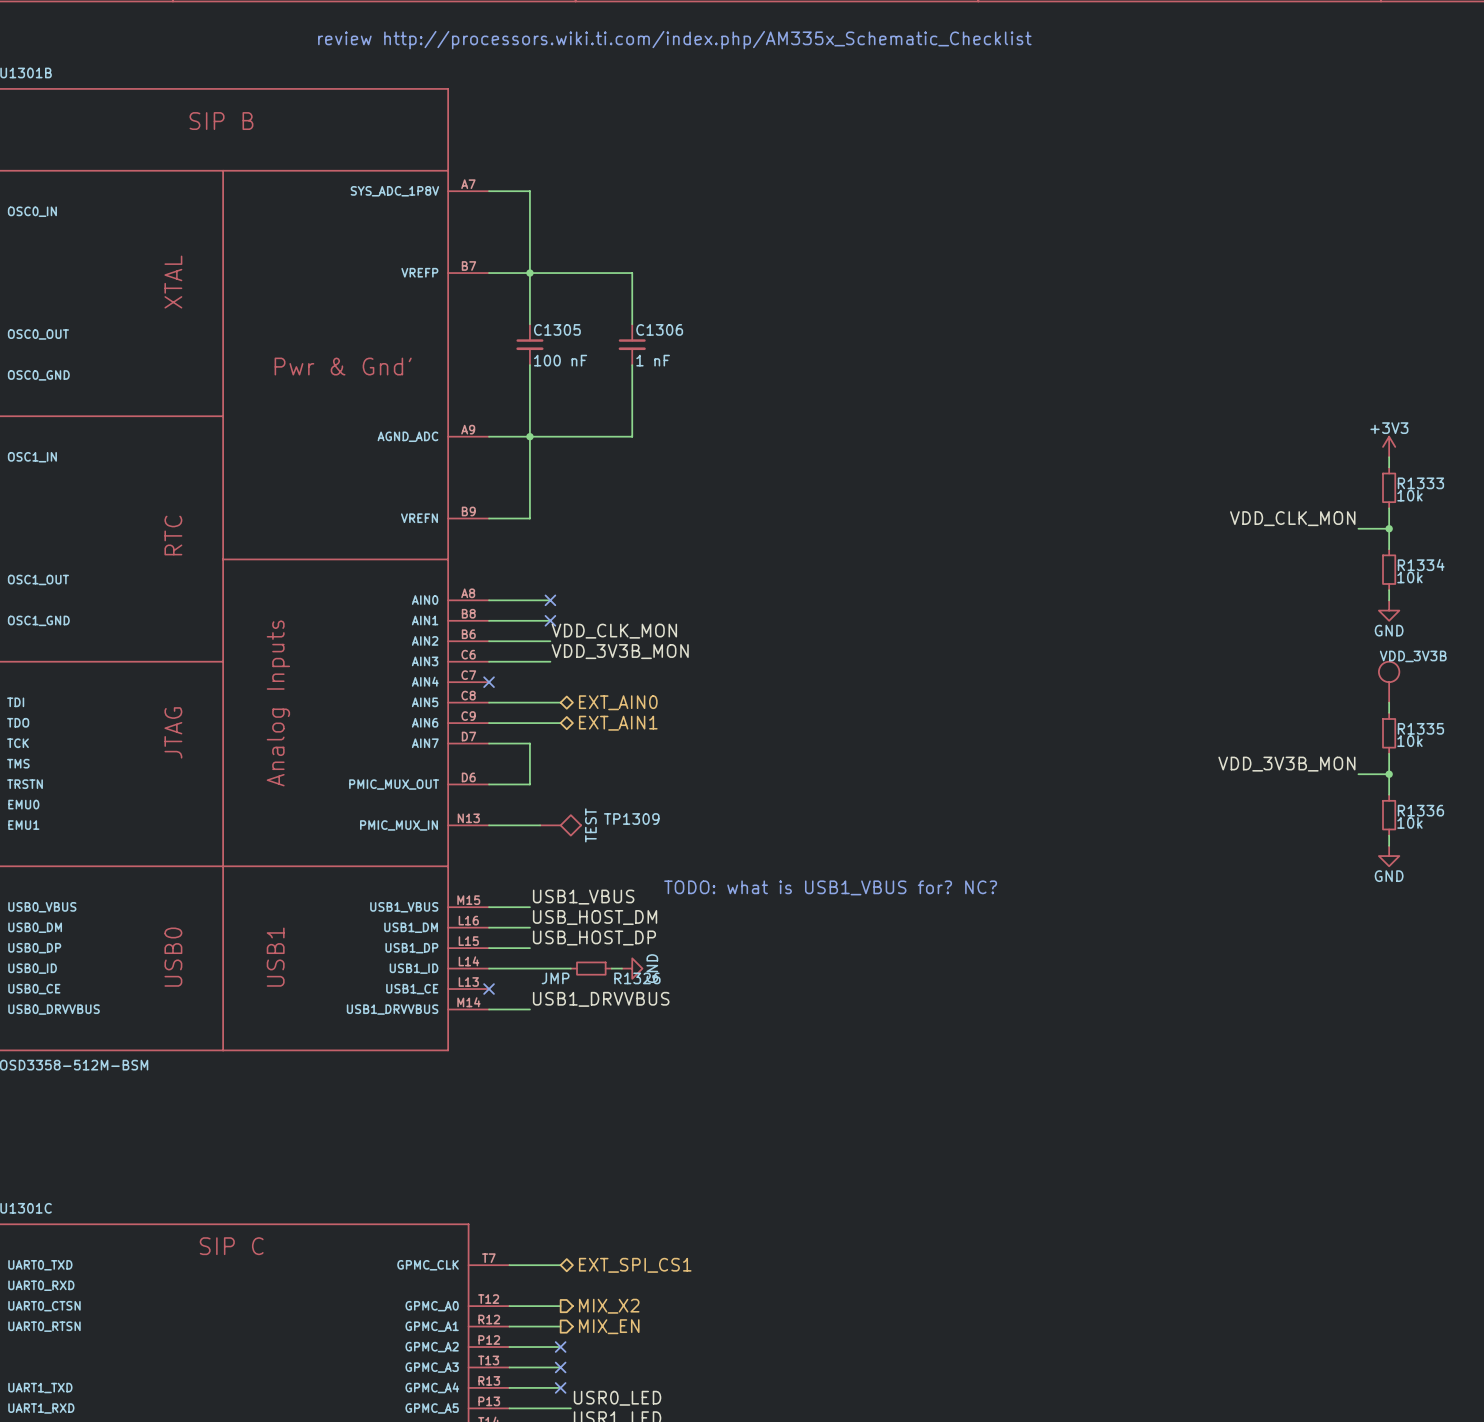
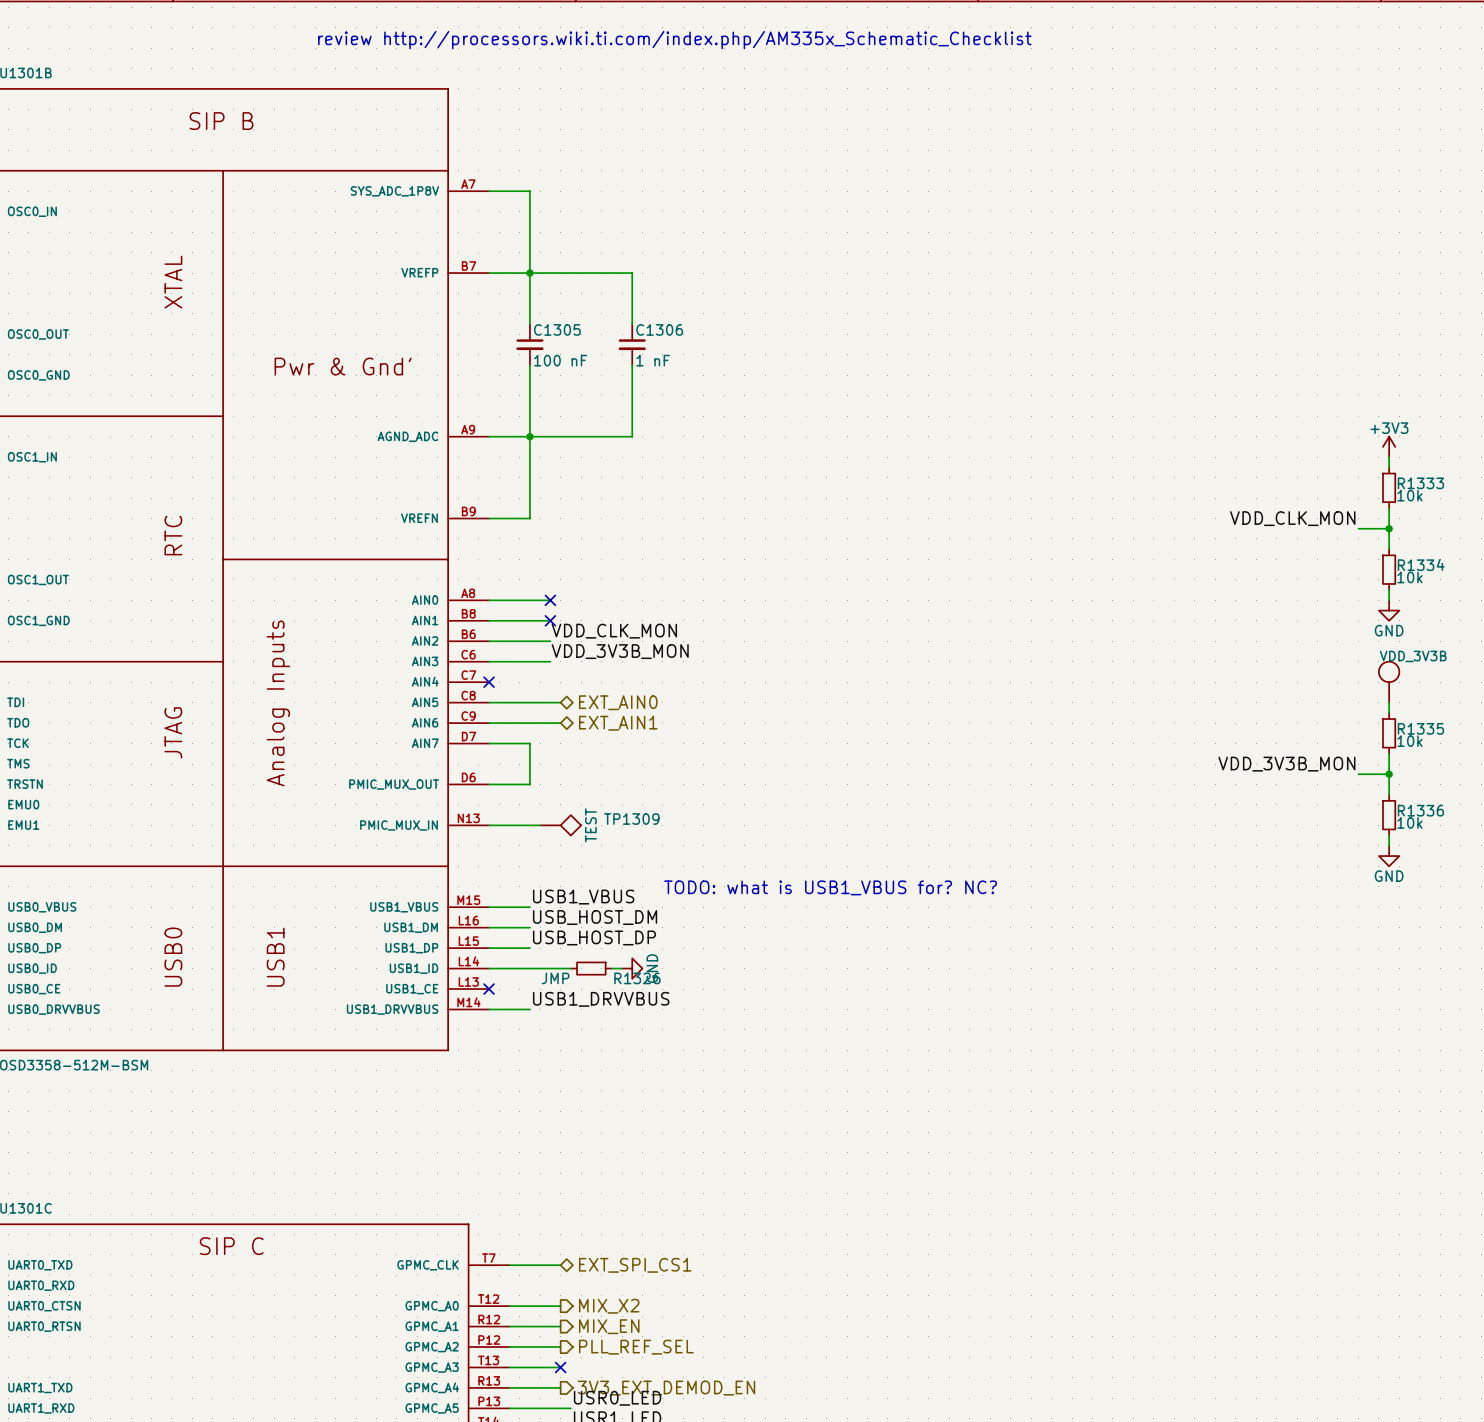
no-connect mark: (560, 1347) -> none
hierarchical label: none -> PLL_REF_SEL (636, 1347)
no-connect mark: (560, 1387) -> none
hierarchical label: none -> 3V3_EXT_DEMOD_EN (666, 1388)

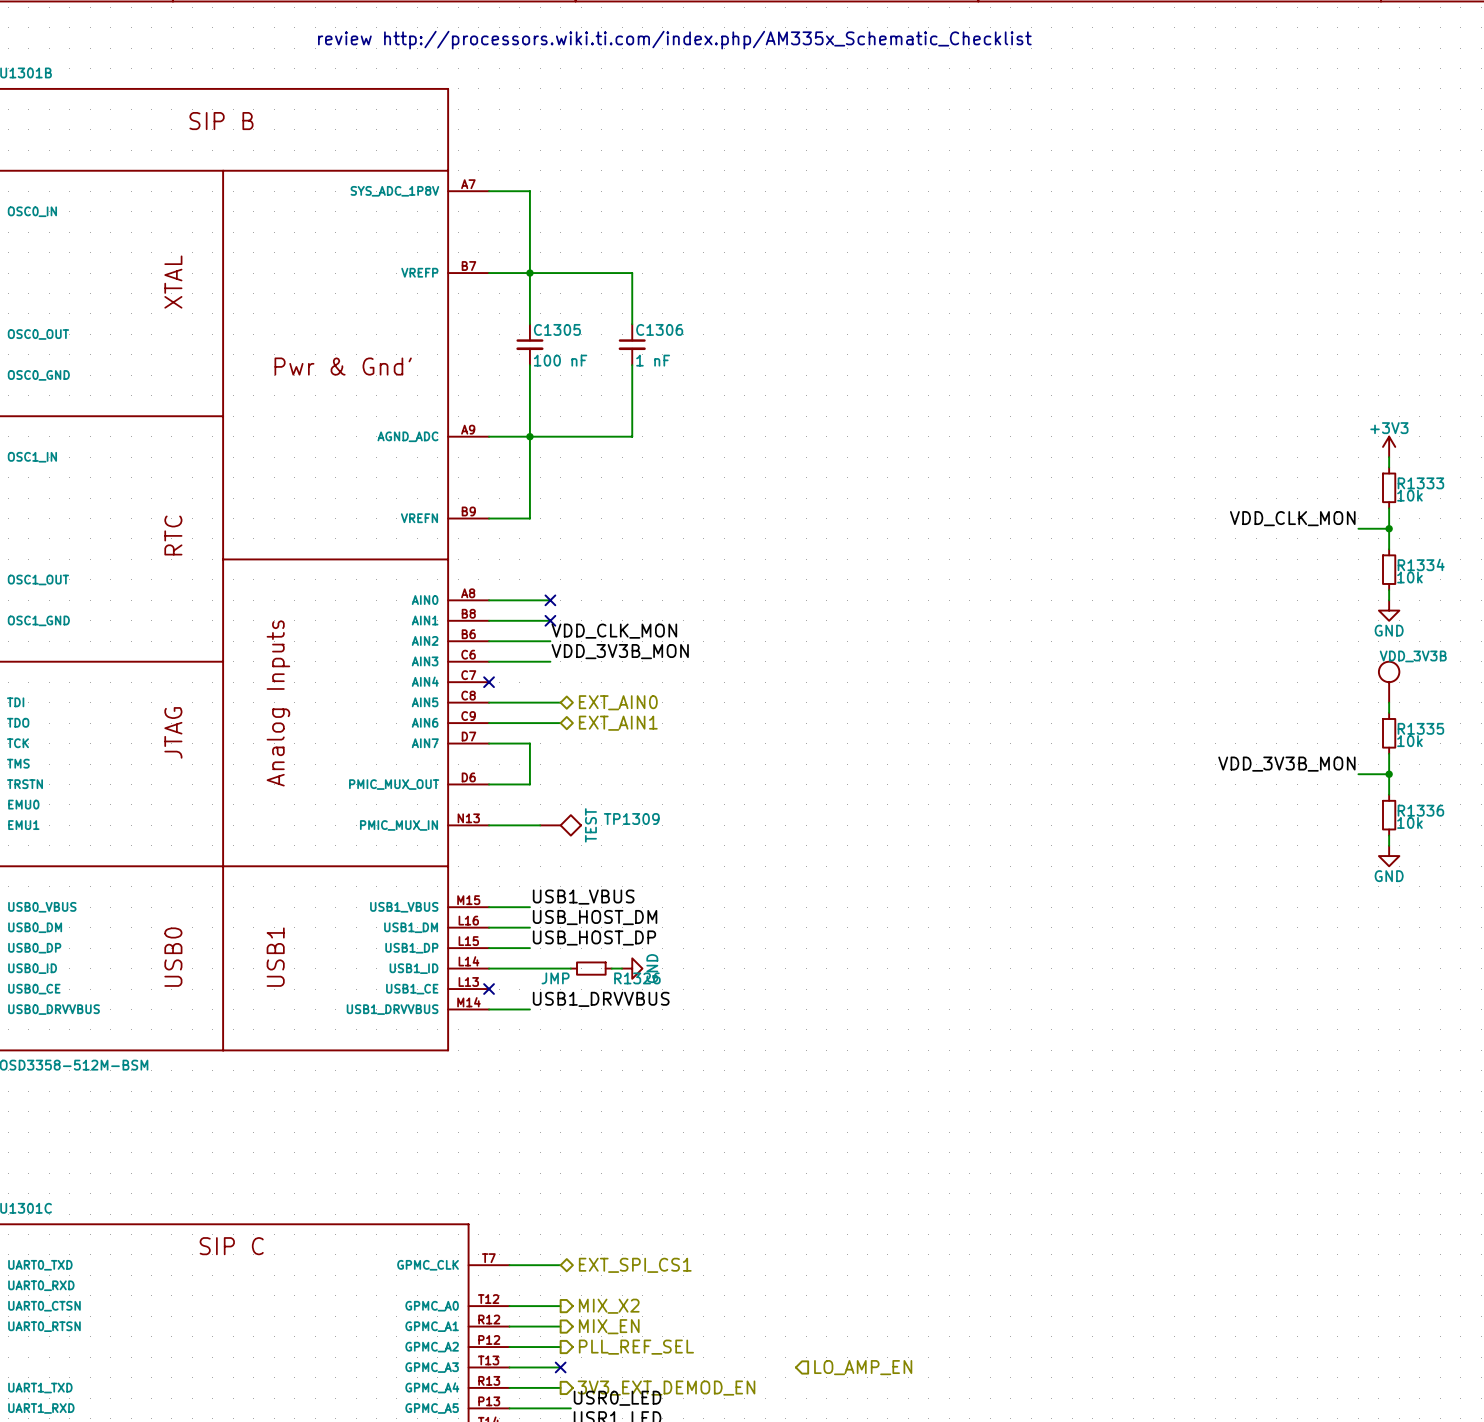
text: TODO: what is USB1_VBUS for? NC? (830, 887) -> none
hierarchical label: none -> LO_AMP_EN (863, 1367)

